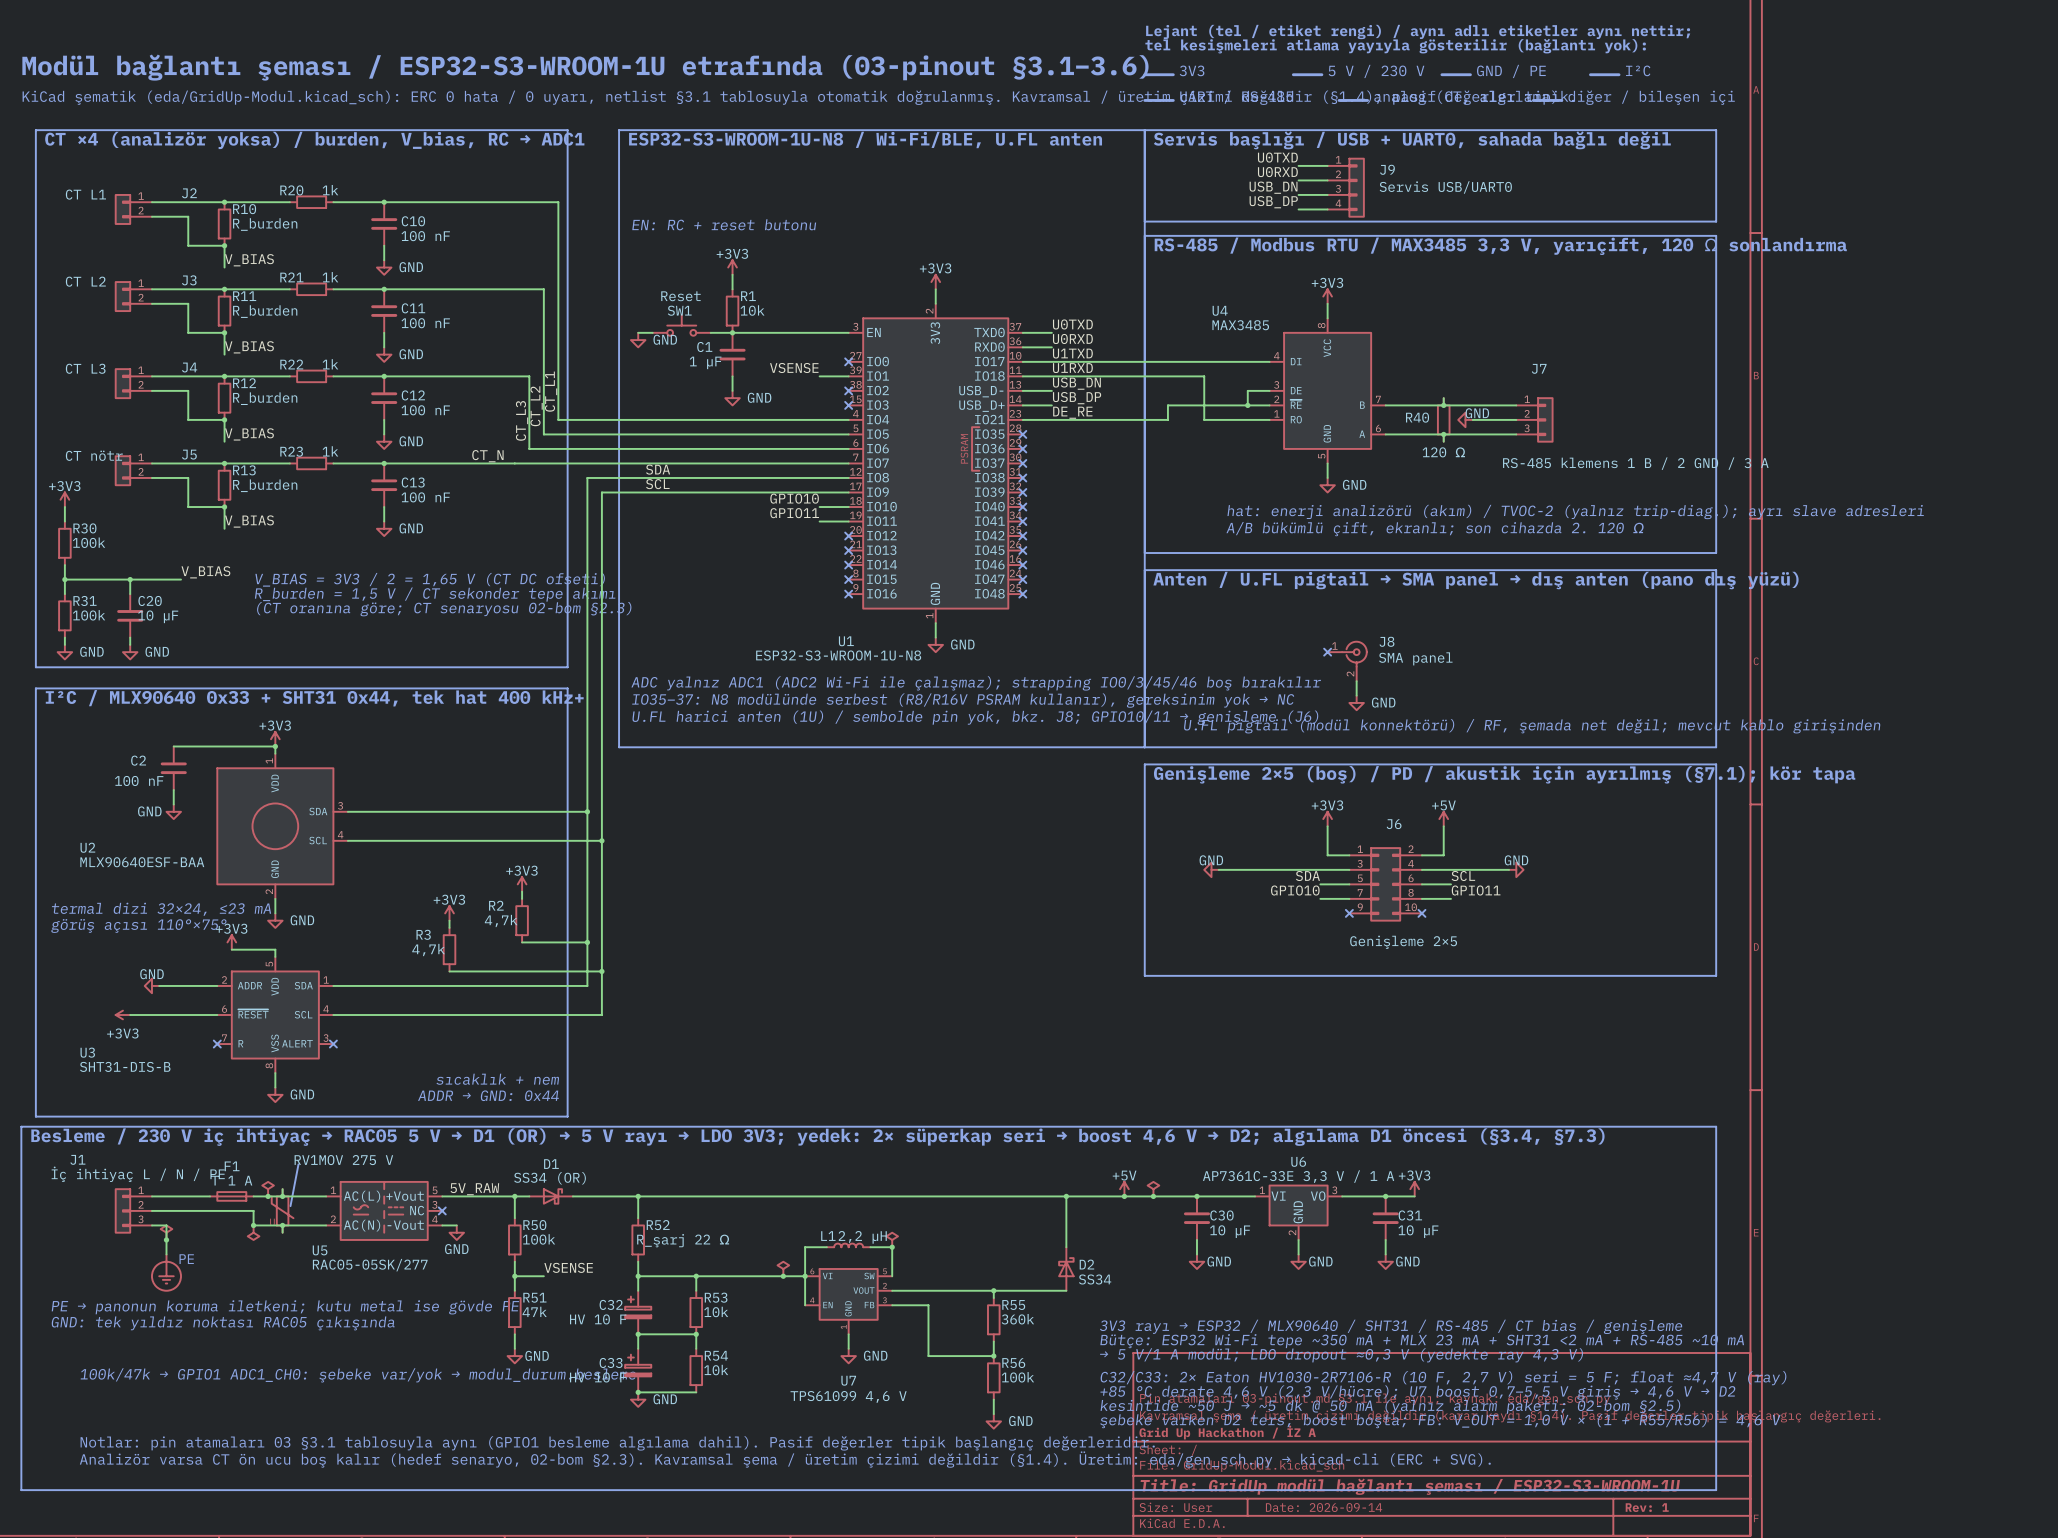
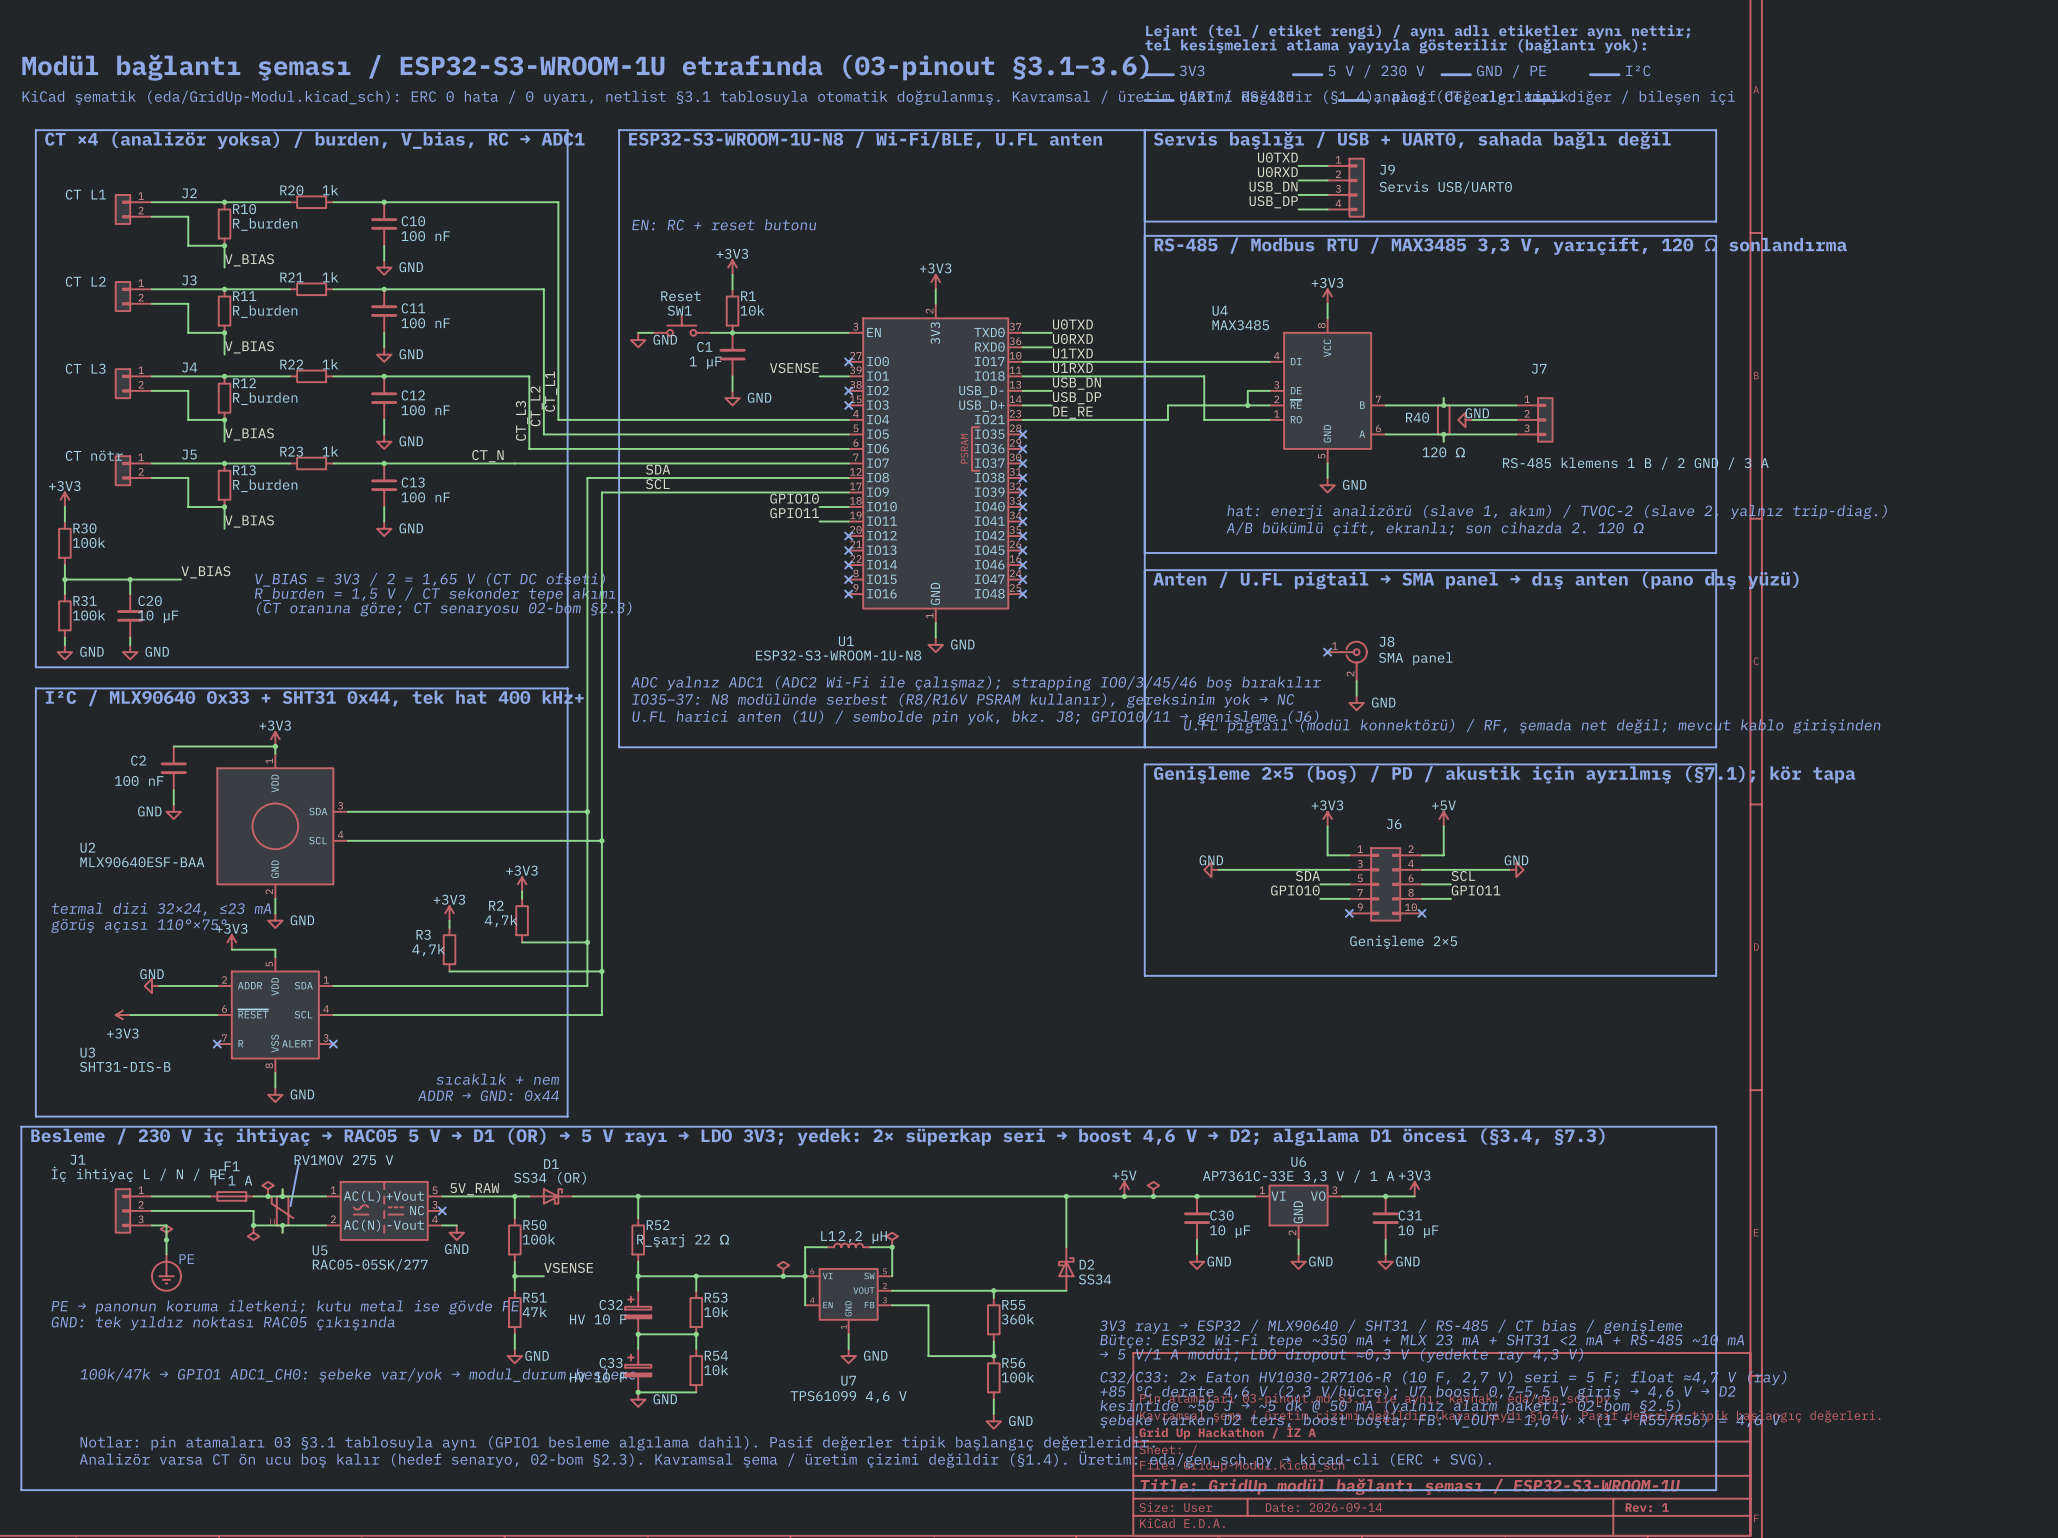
text: hat: enerji analizörü (akım) / TVOC-2 (yalnız trip-diag.); ayrı slave adresleri (1575, 512) -> hat: enerji analizörü (slave 1, akım) / TVOC-2 (slave 2, yalnız trip-diag.) (1557, 512)

